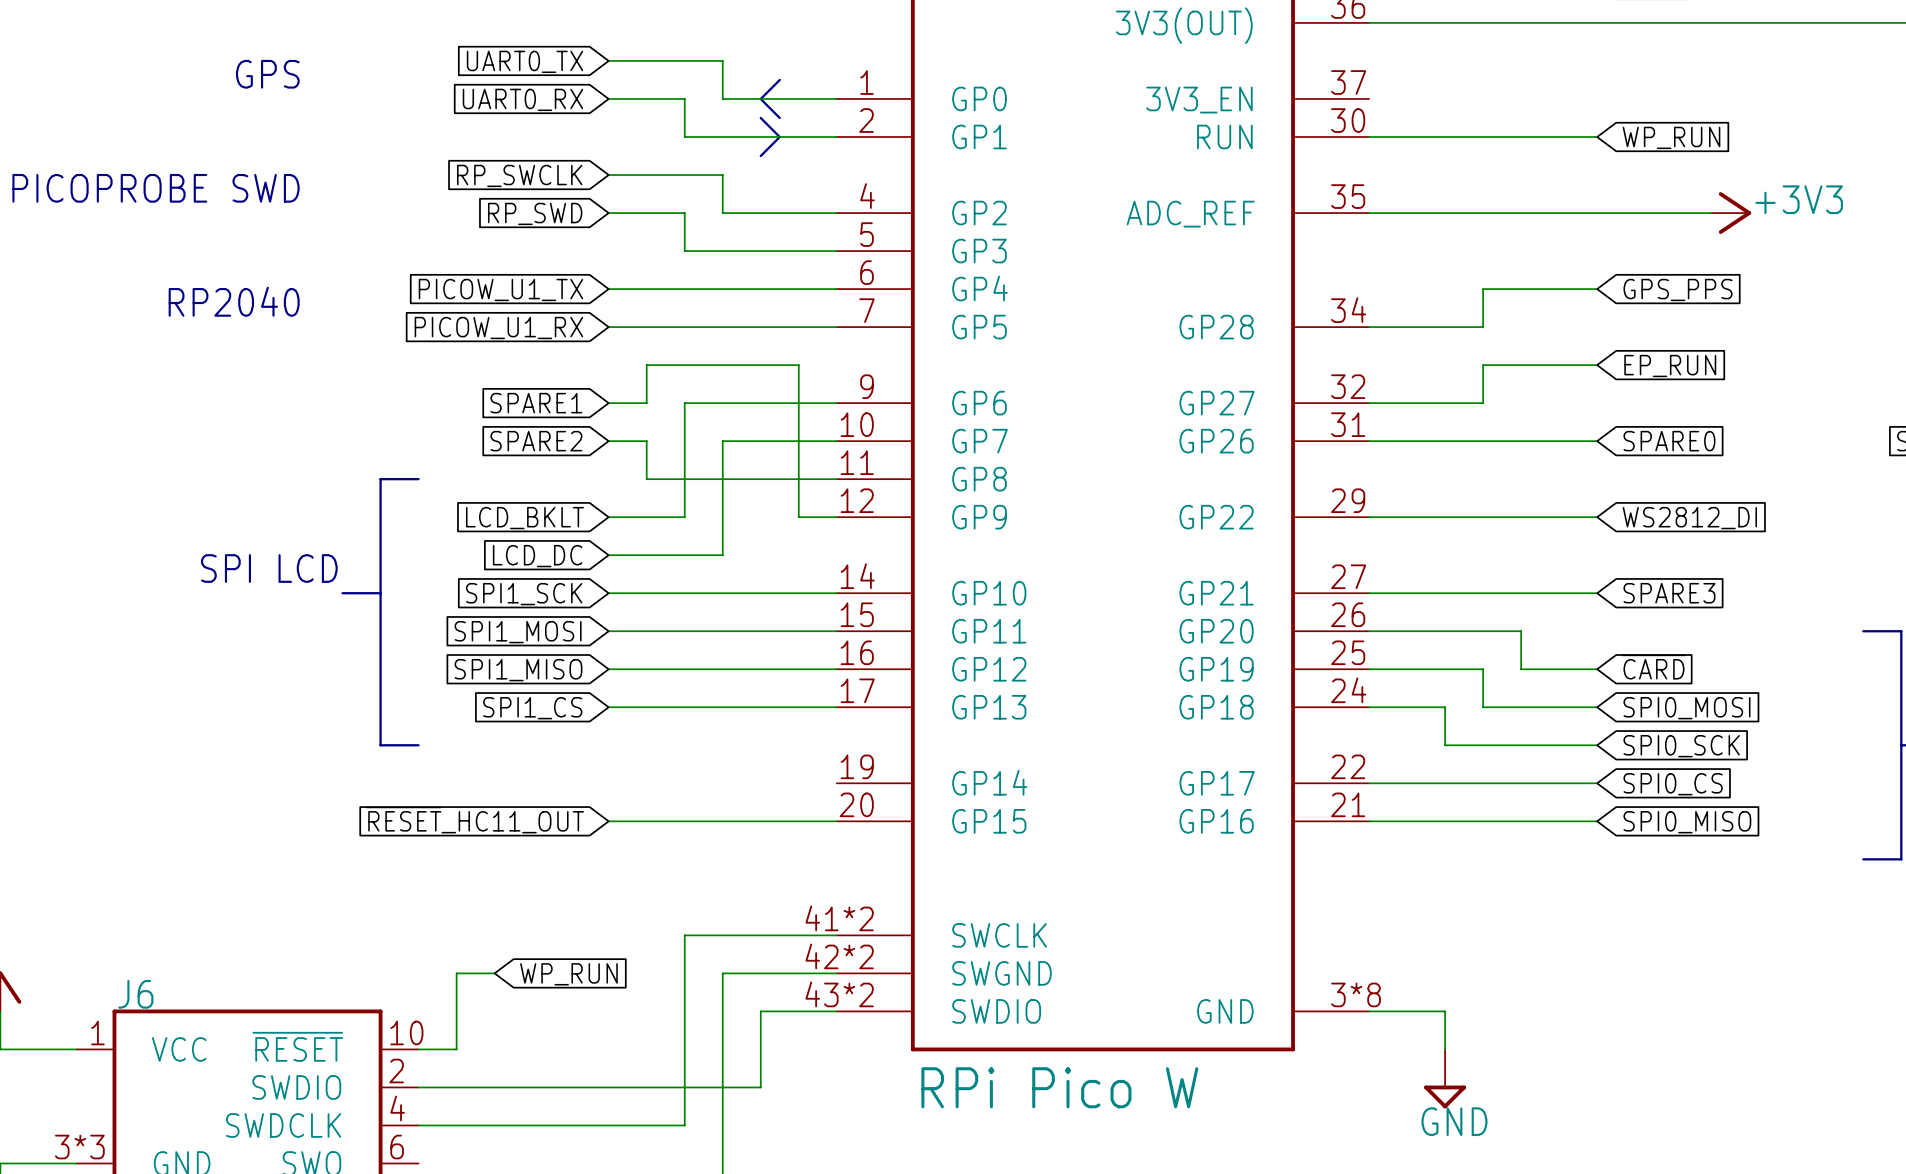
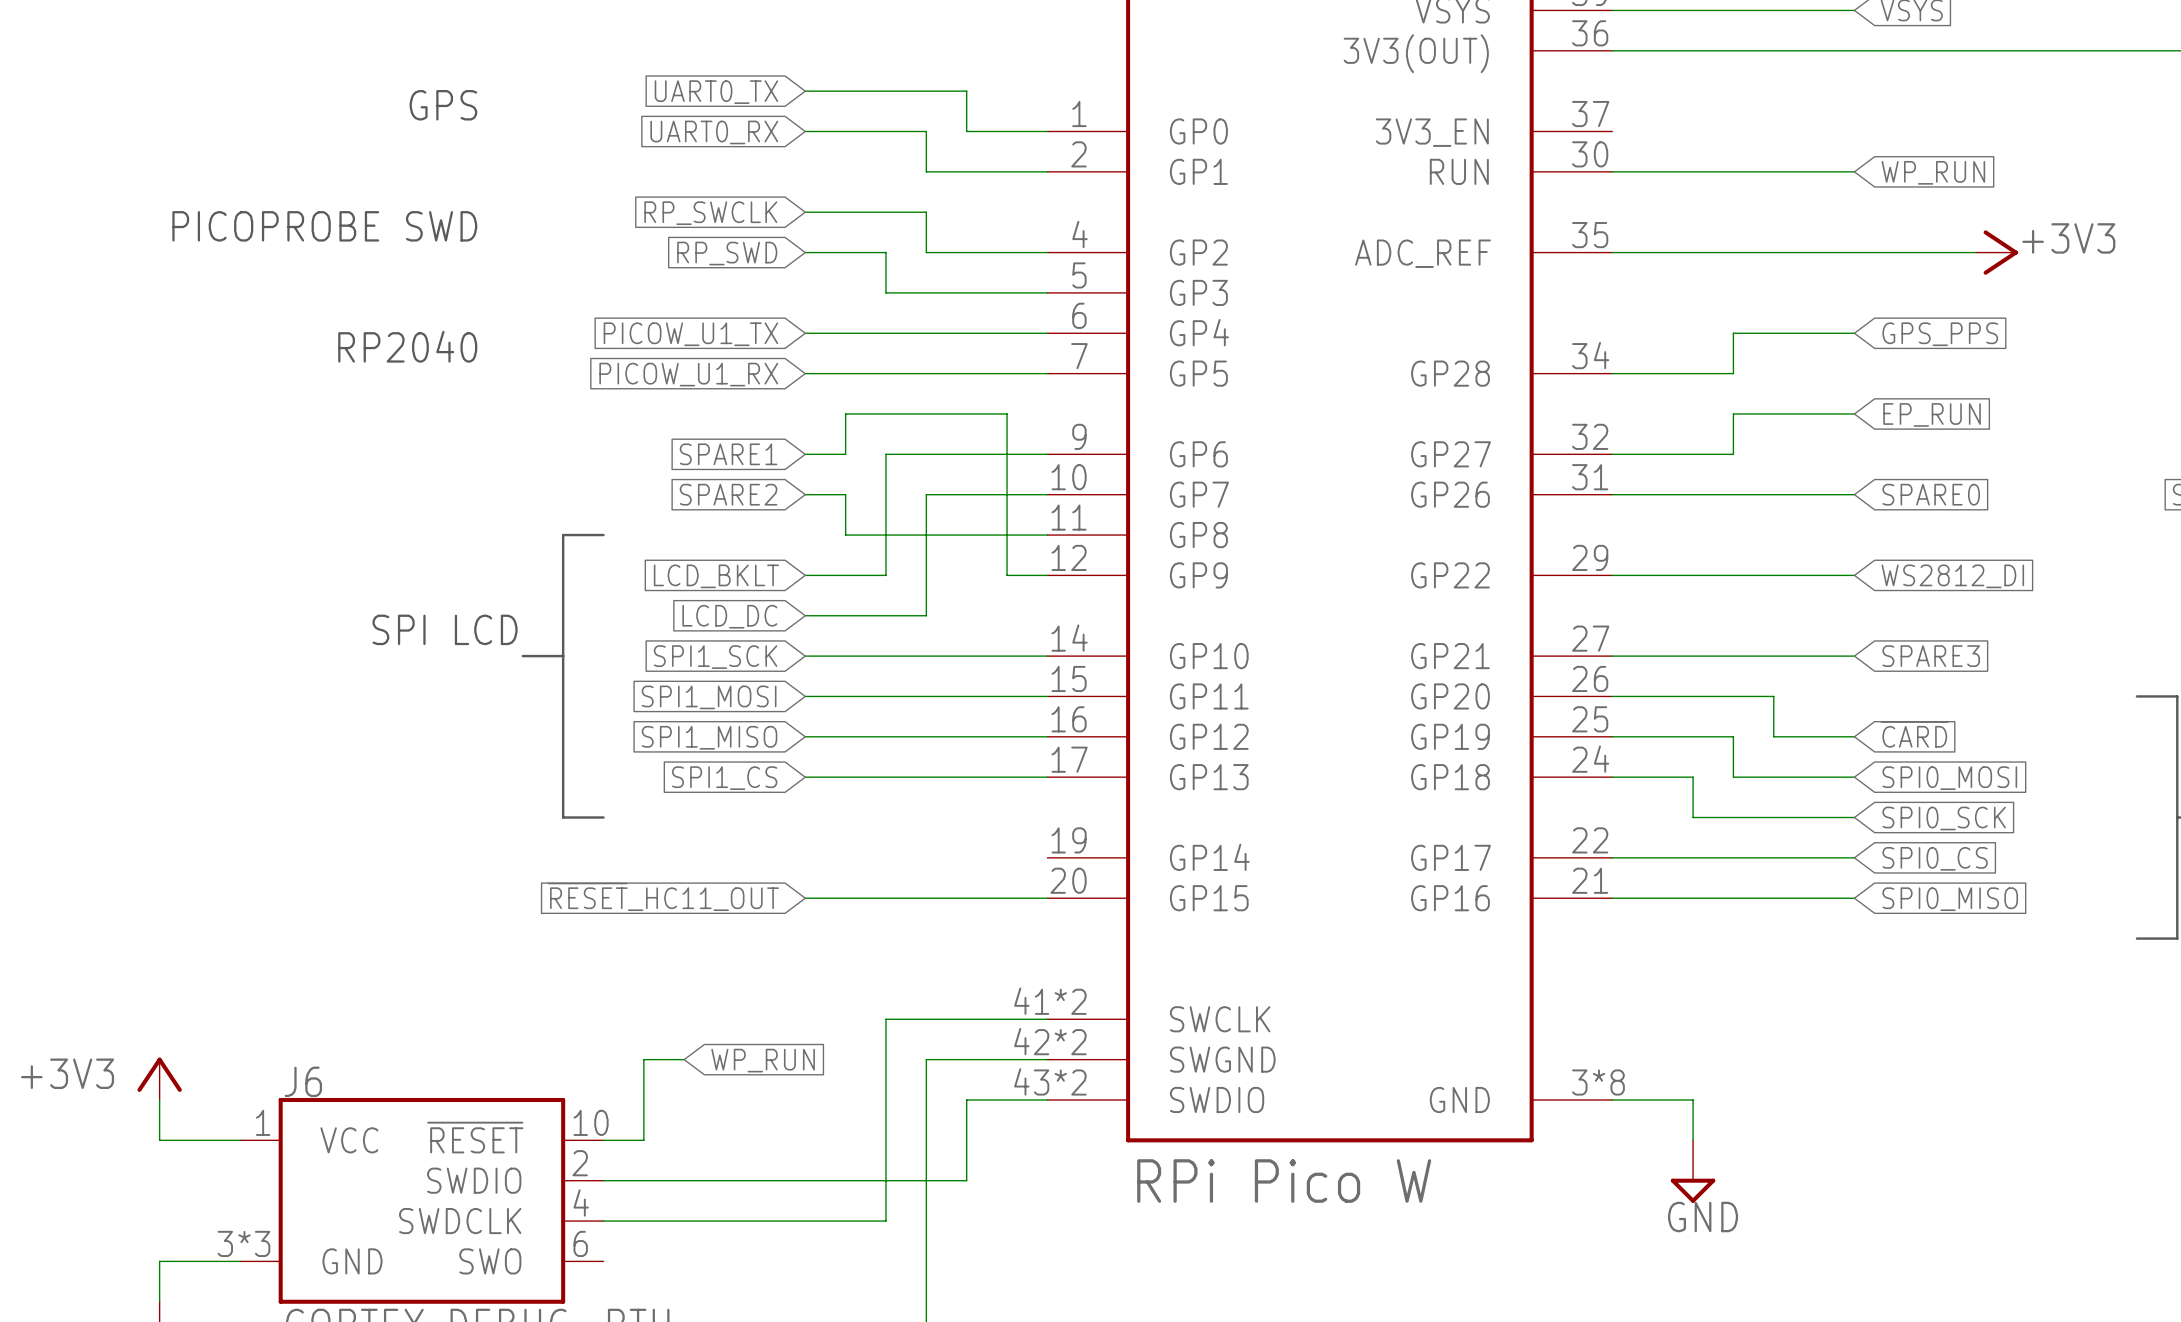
wire: (722, 60) (722, 98) (760, 98) -> (926, 91) (966, 91) (966, 131)
line: (779, 79) (760, 98) (779, 117) -> none
wire: (684, 98) (684, 137) (722, 137) -> (885, 131) (926, 131) (926, 171)
line: (760, 117) (779, 137) (760, 156) -> none

